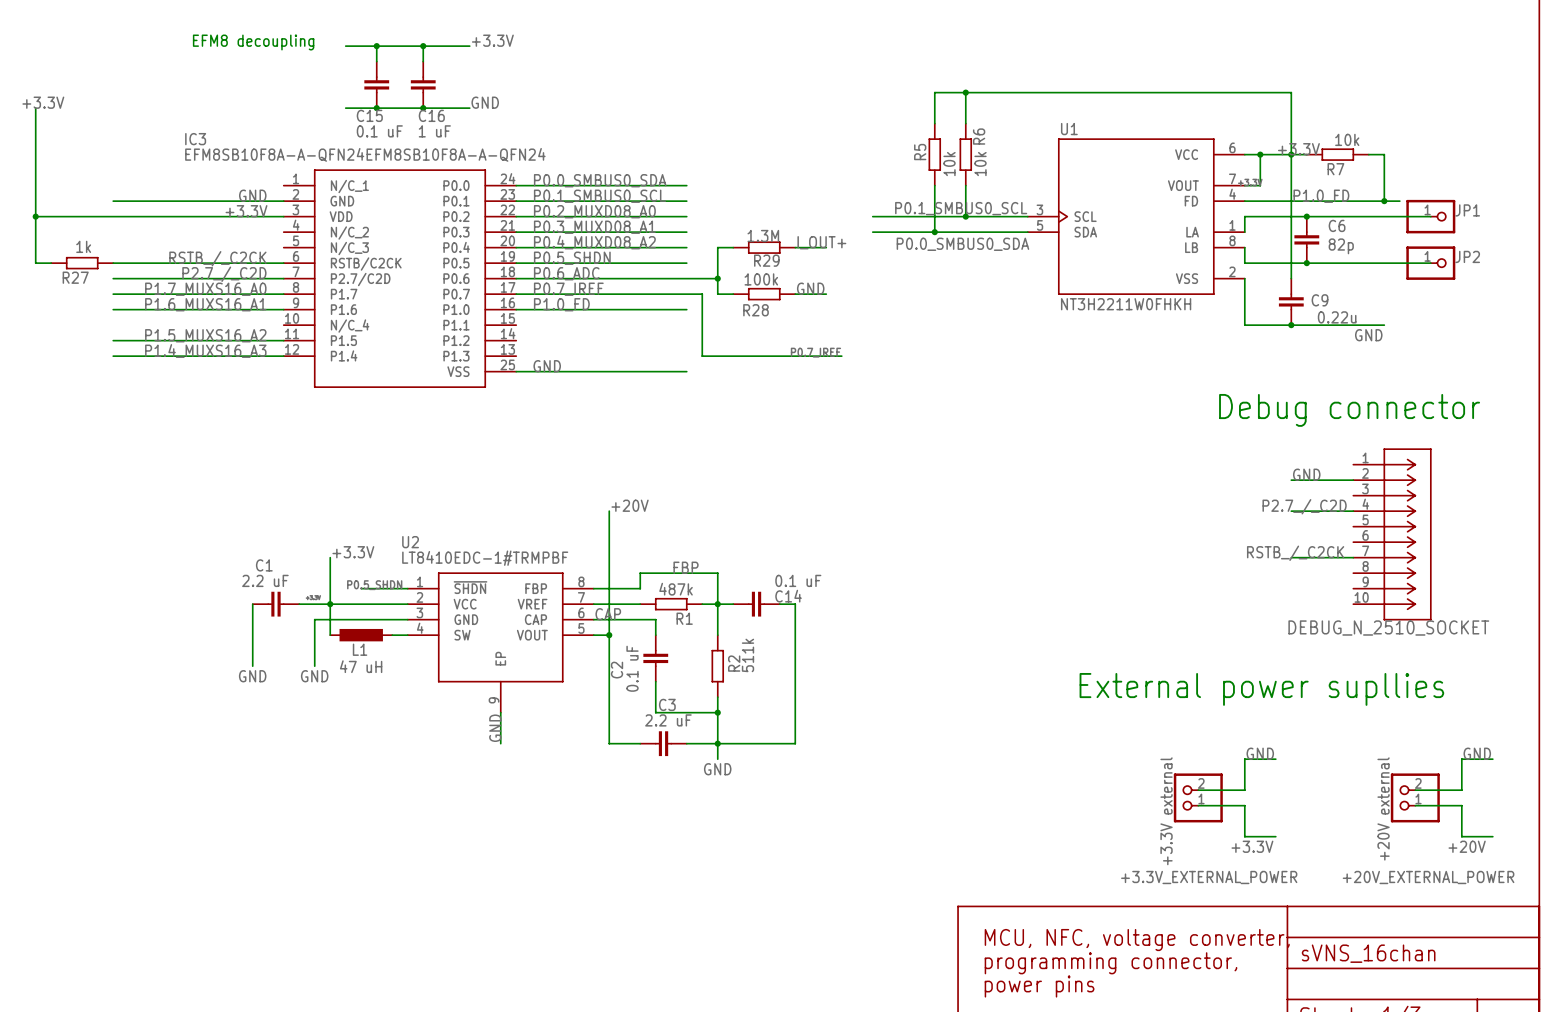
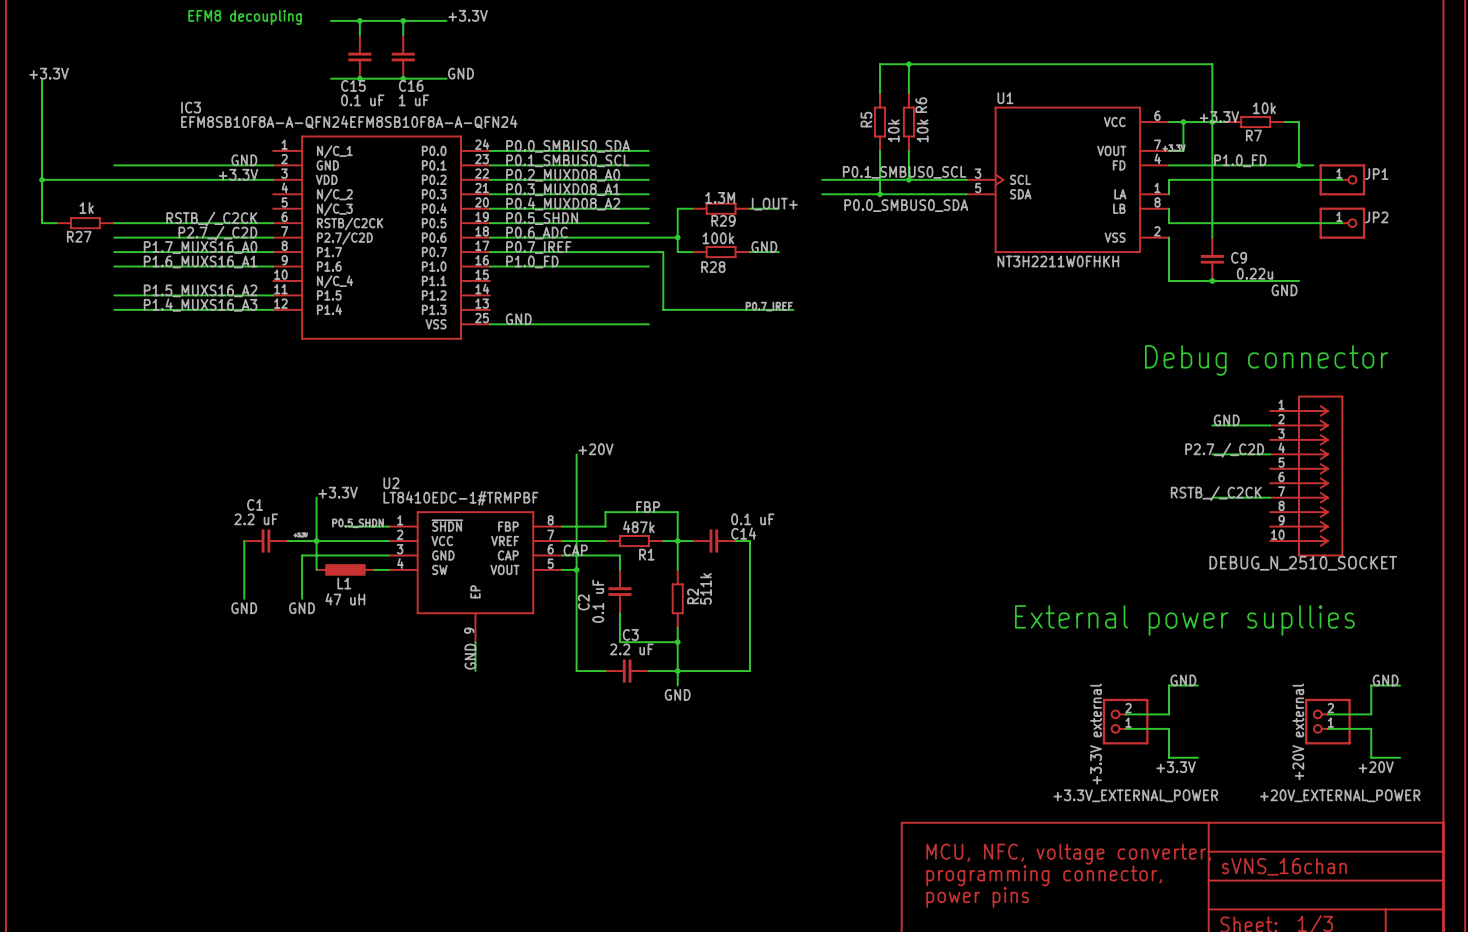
junction: (1306, 216) -> none
C6: 82p (1306, 239) -> none
junction: (1306, 263) -> none

